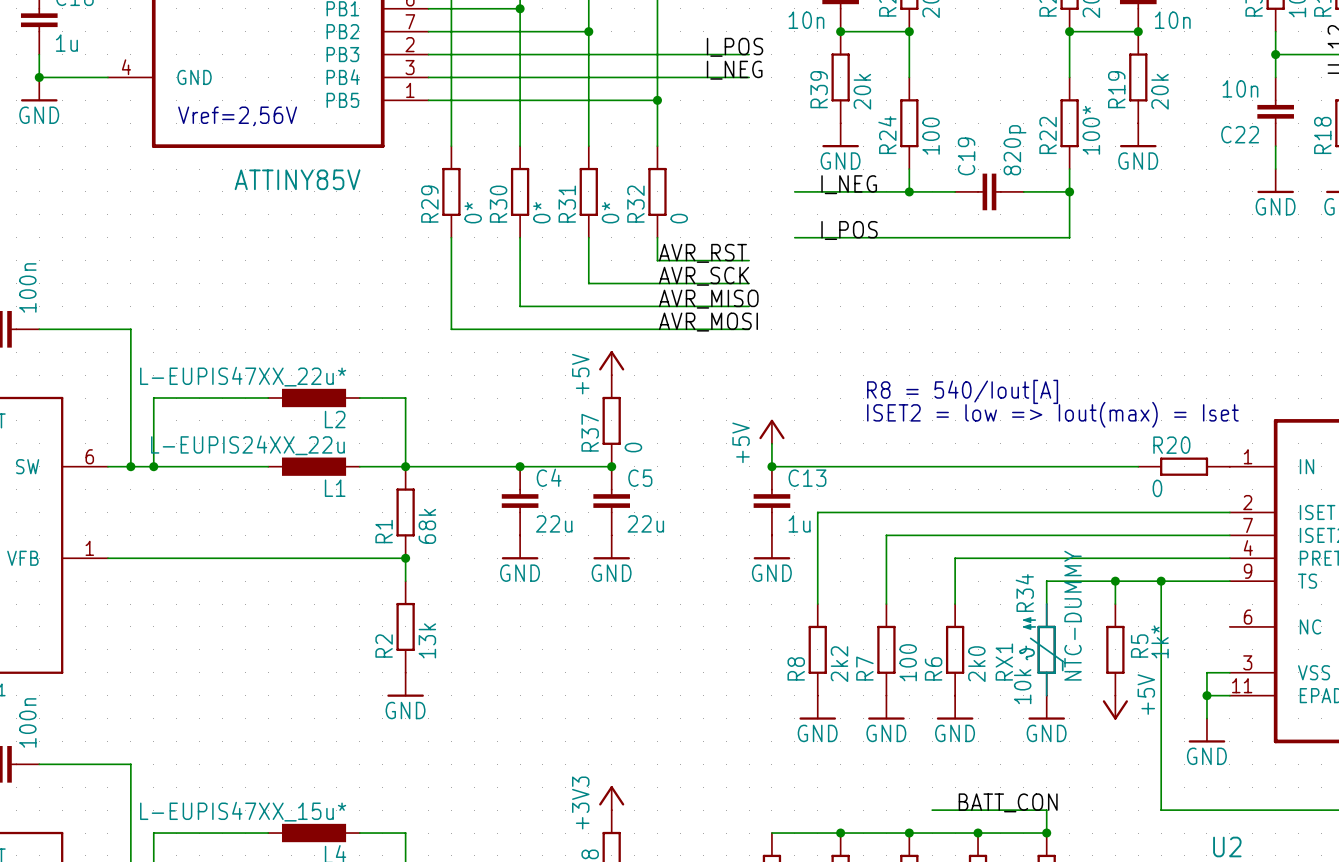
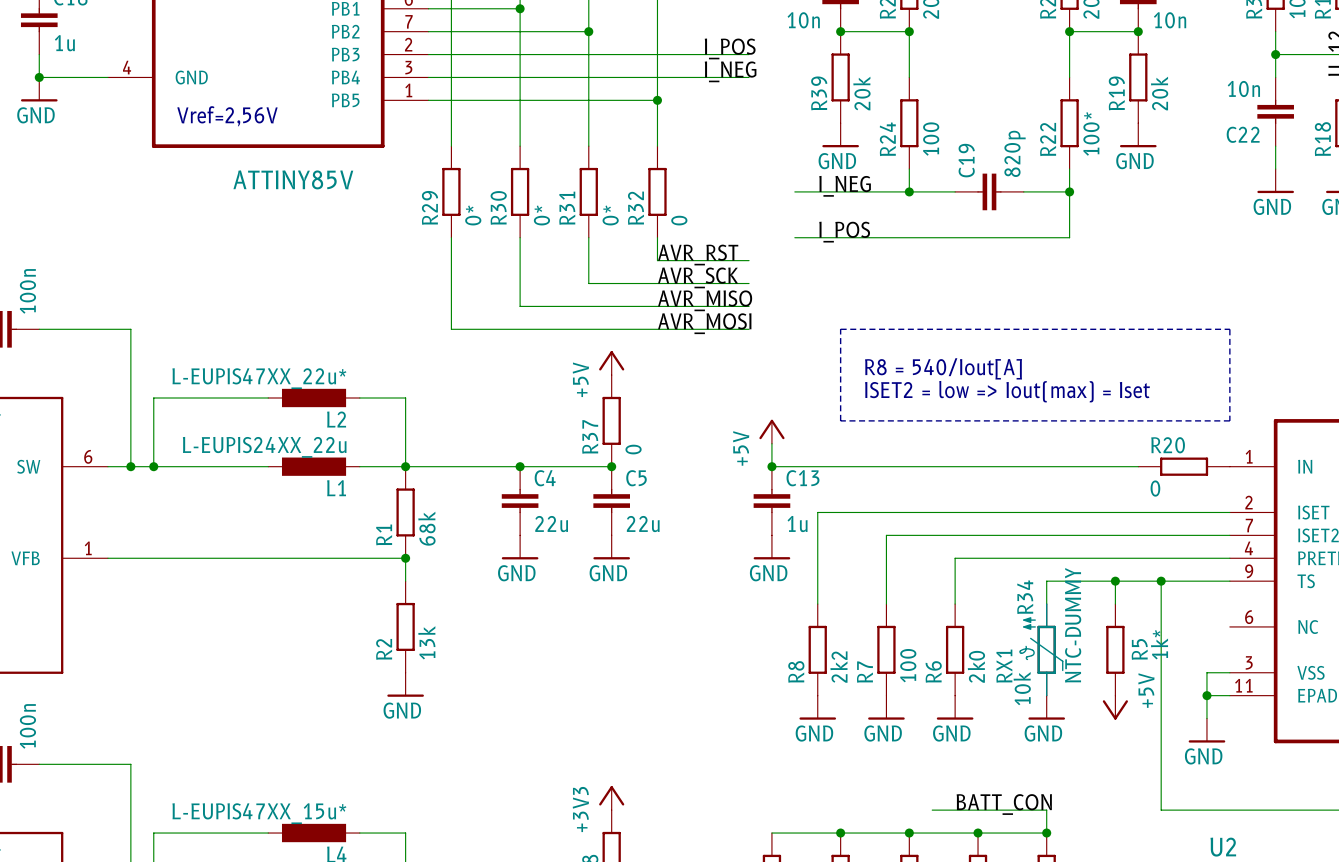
line: none -> (840, 329) (1229, 329) (1229, 420) (840, 420) (840, 329)
text: none -> R8 = 540/Iout[A] (943, 368)
text: R8 = 540/Iout[A] (962, 391) -> ISET2 = low => Iout(max) = Iset (1007, 391)
text: ISET2 = low => Iout(max) = Iset (1052, 414) -> none

